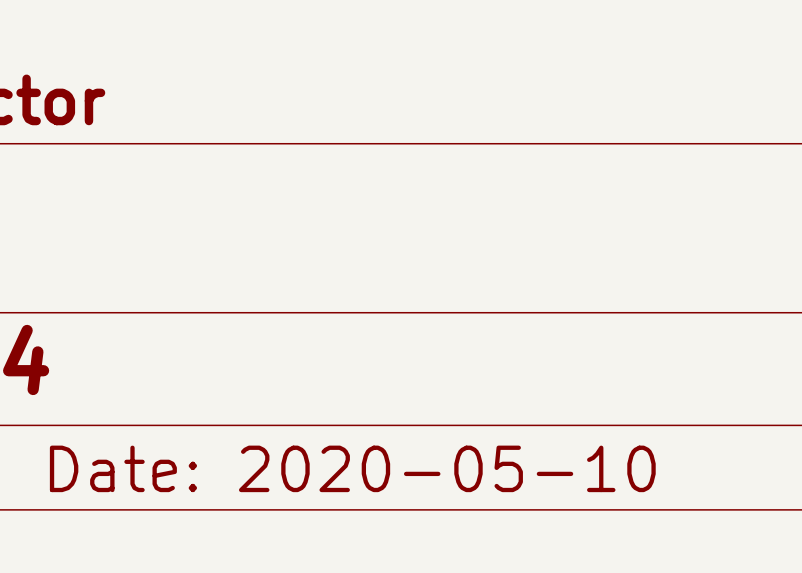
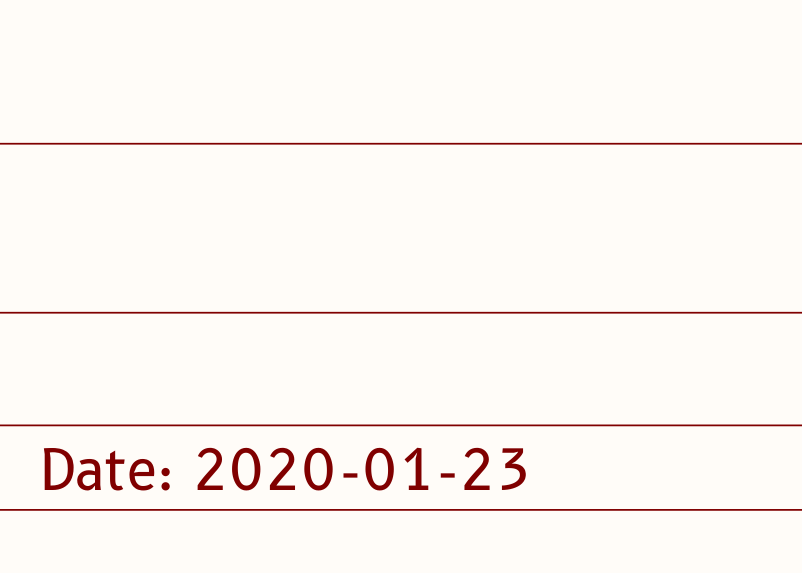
title block: Date: 2020-05-10 (352, 468) -> Date: 2020-01-23 (284, 469)

